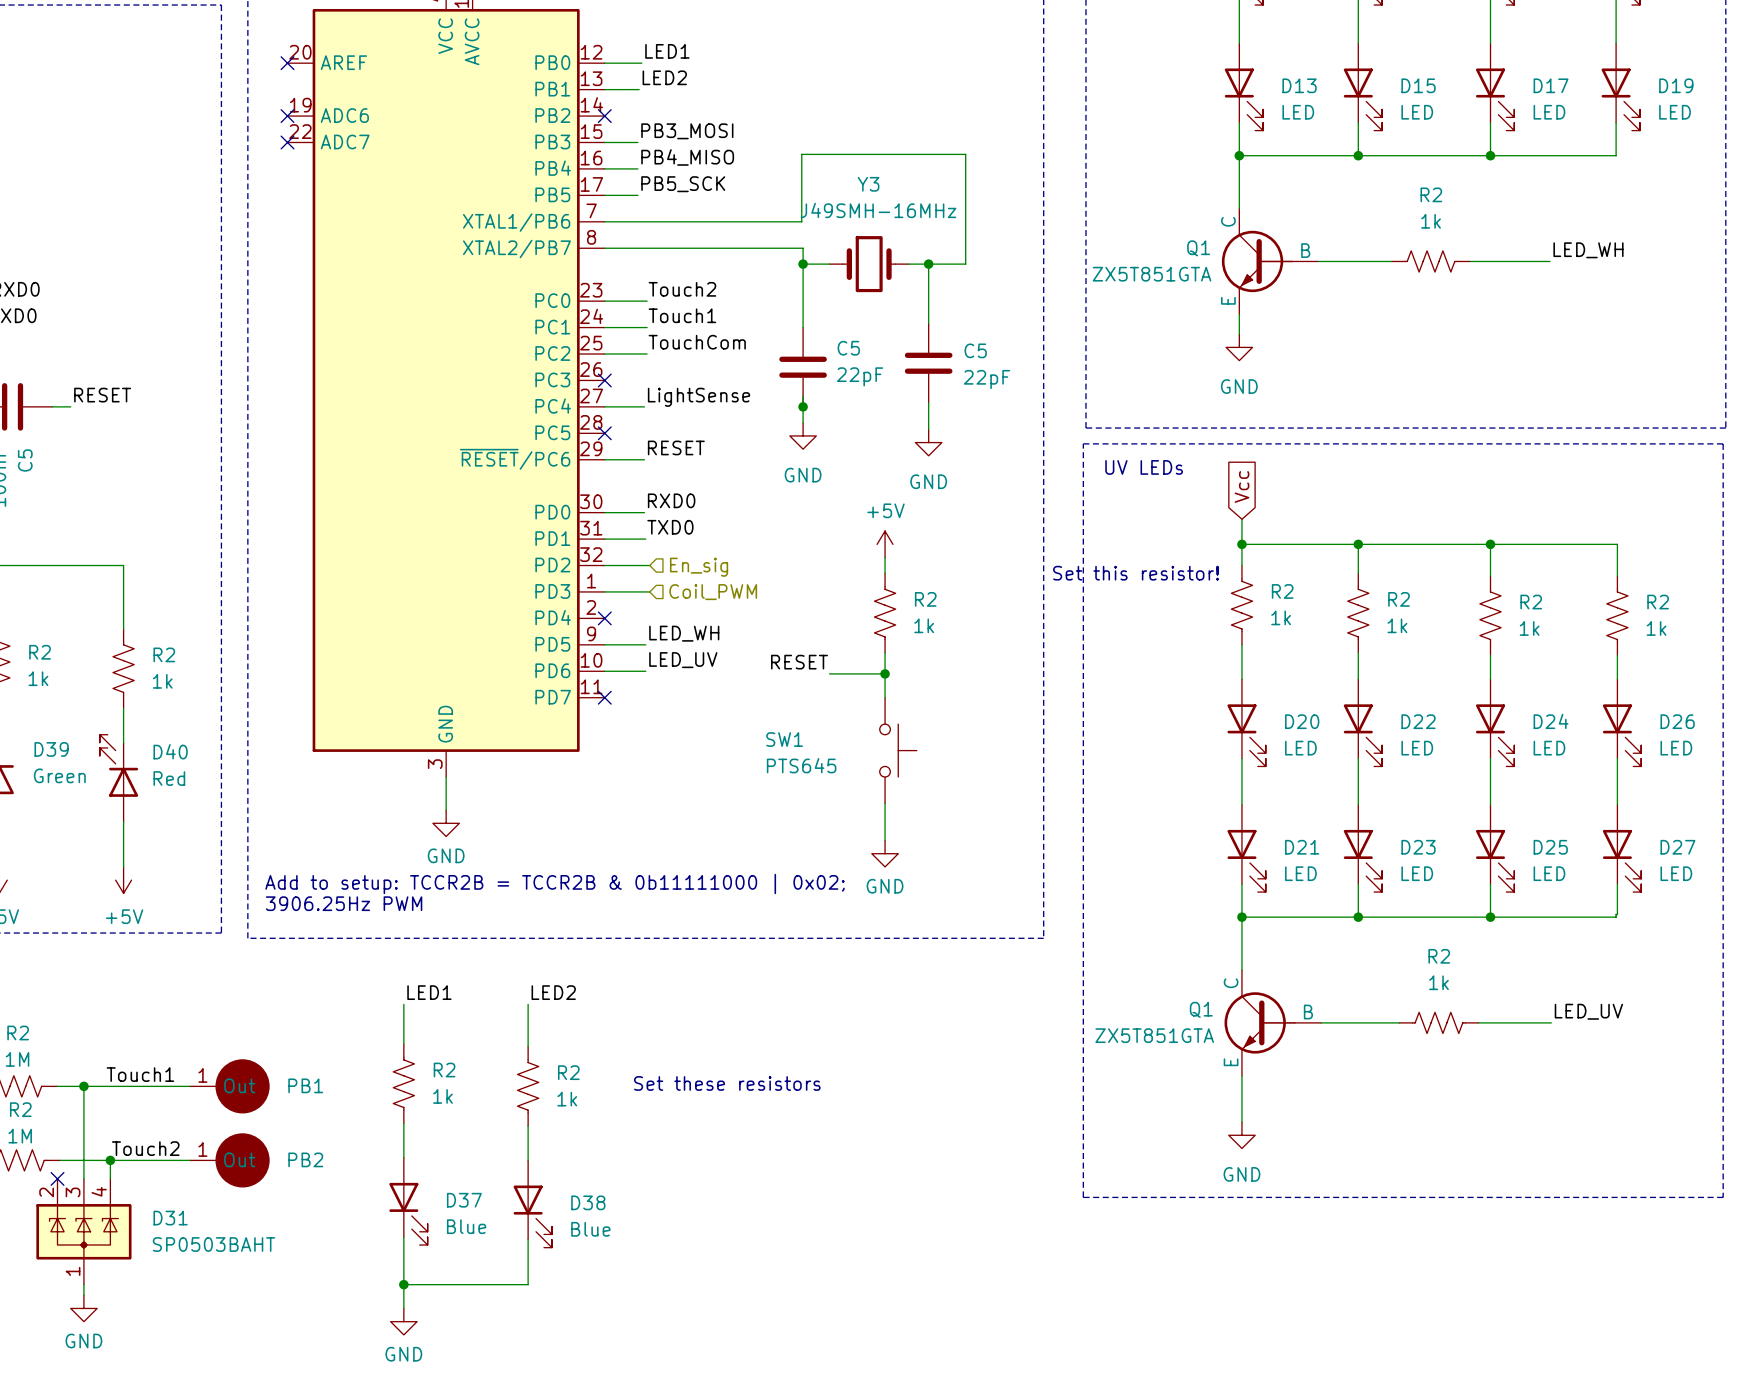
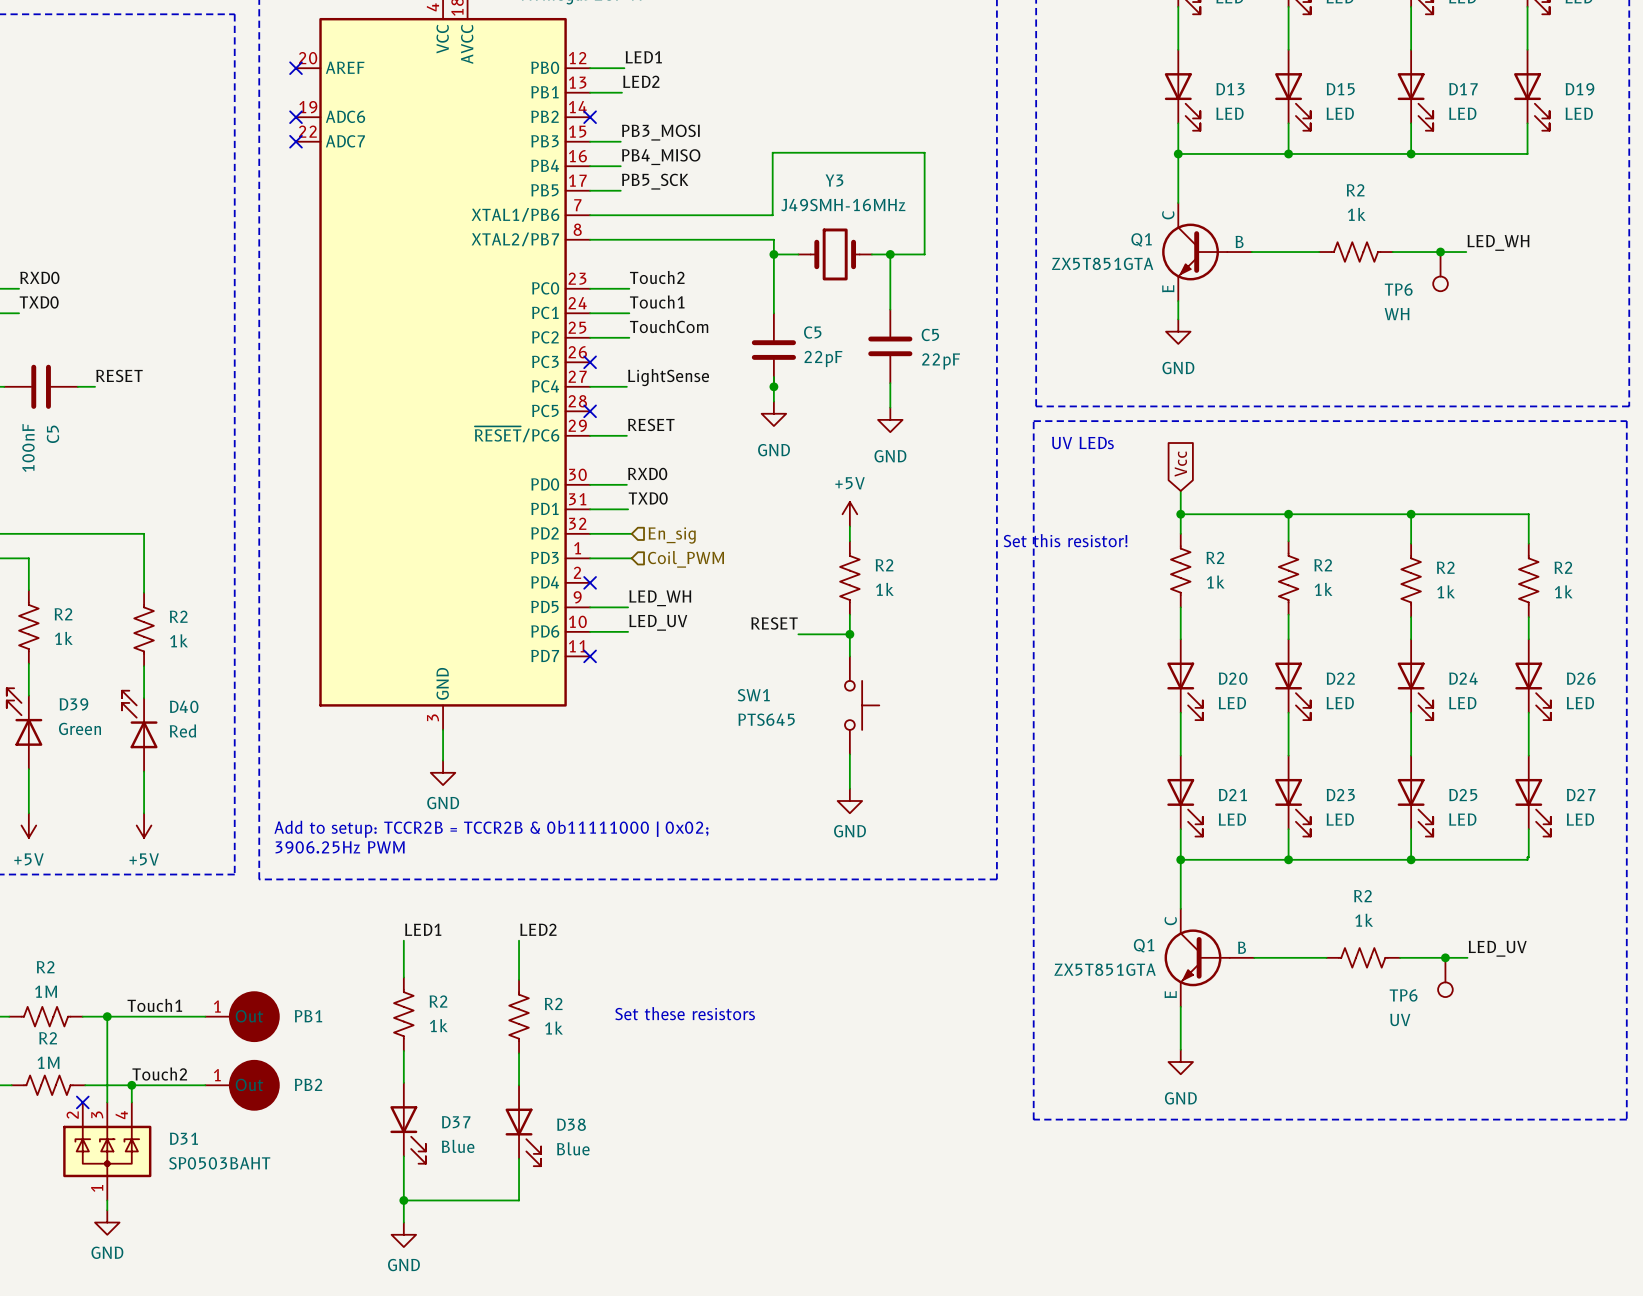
junction: none -> (1440, 252)
TP6: none -> WH (1440, 271)
junction: none -> (1445, 957)
TP6: none -> UV (1445, 977)

